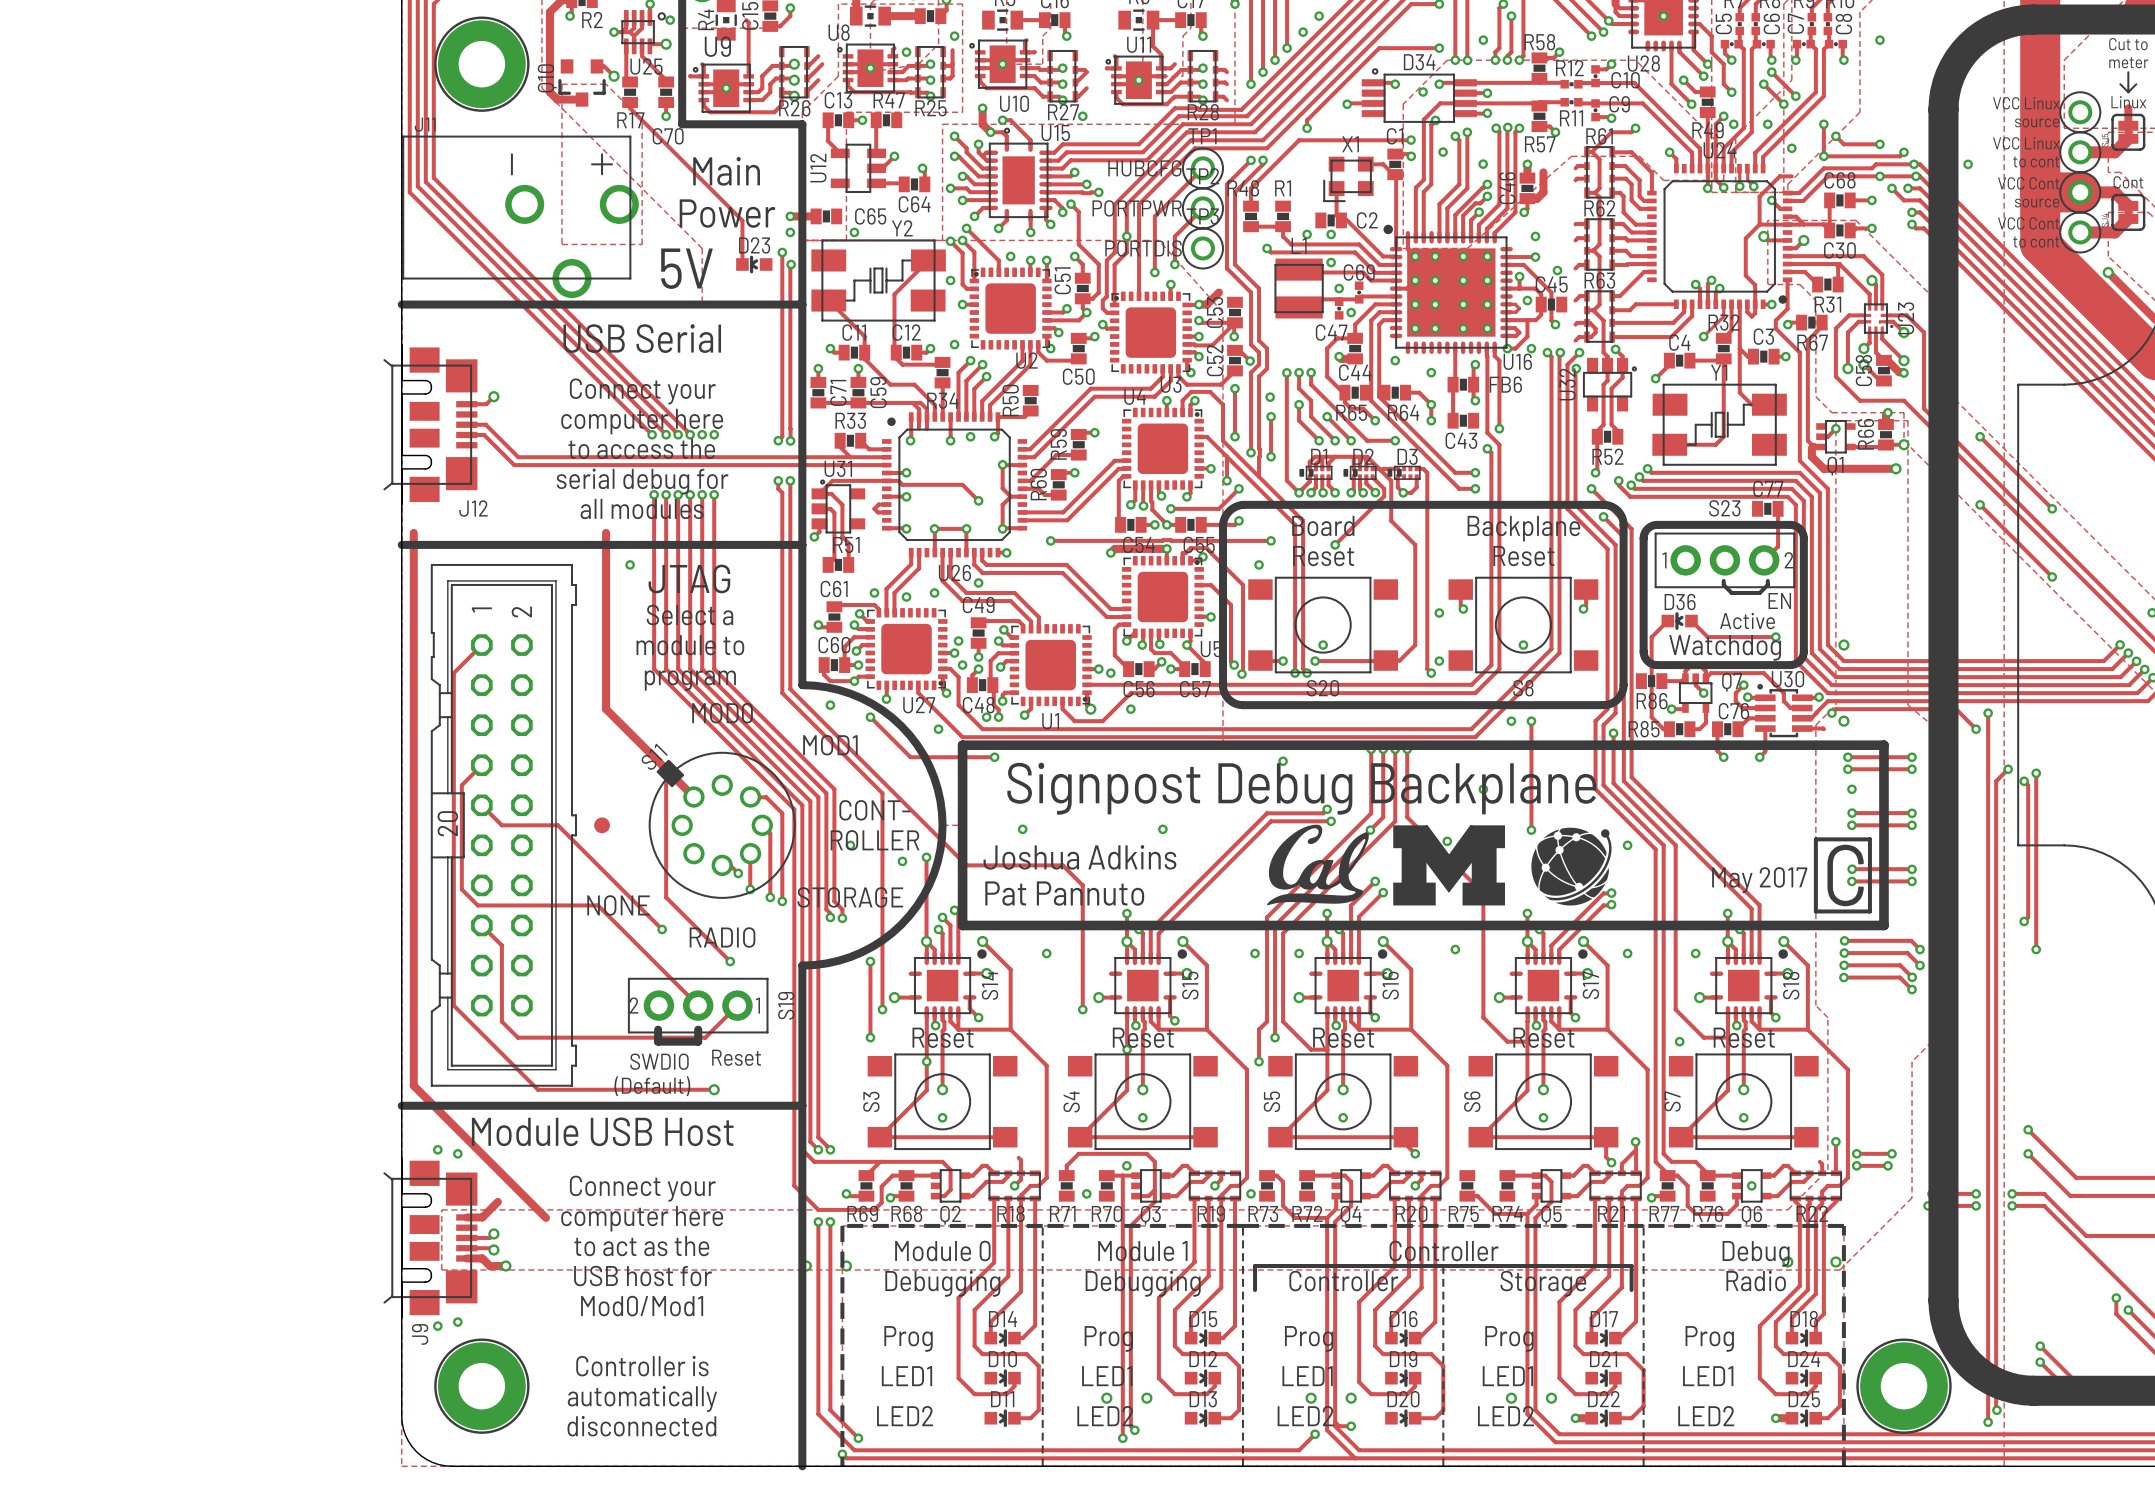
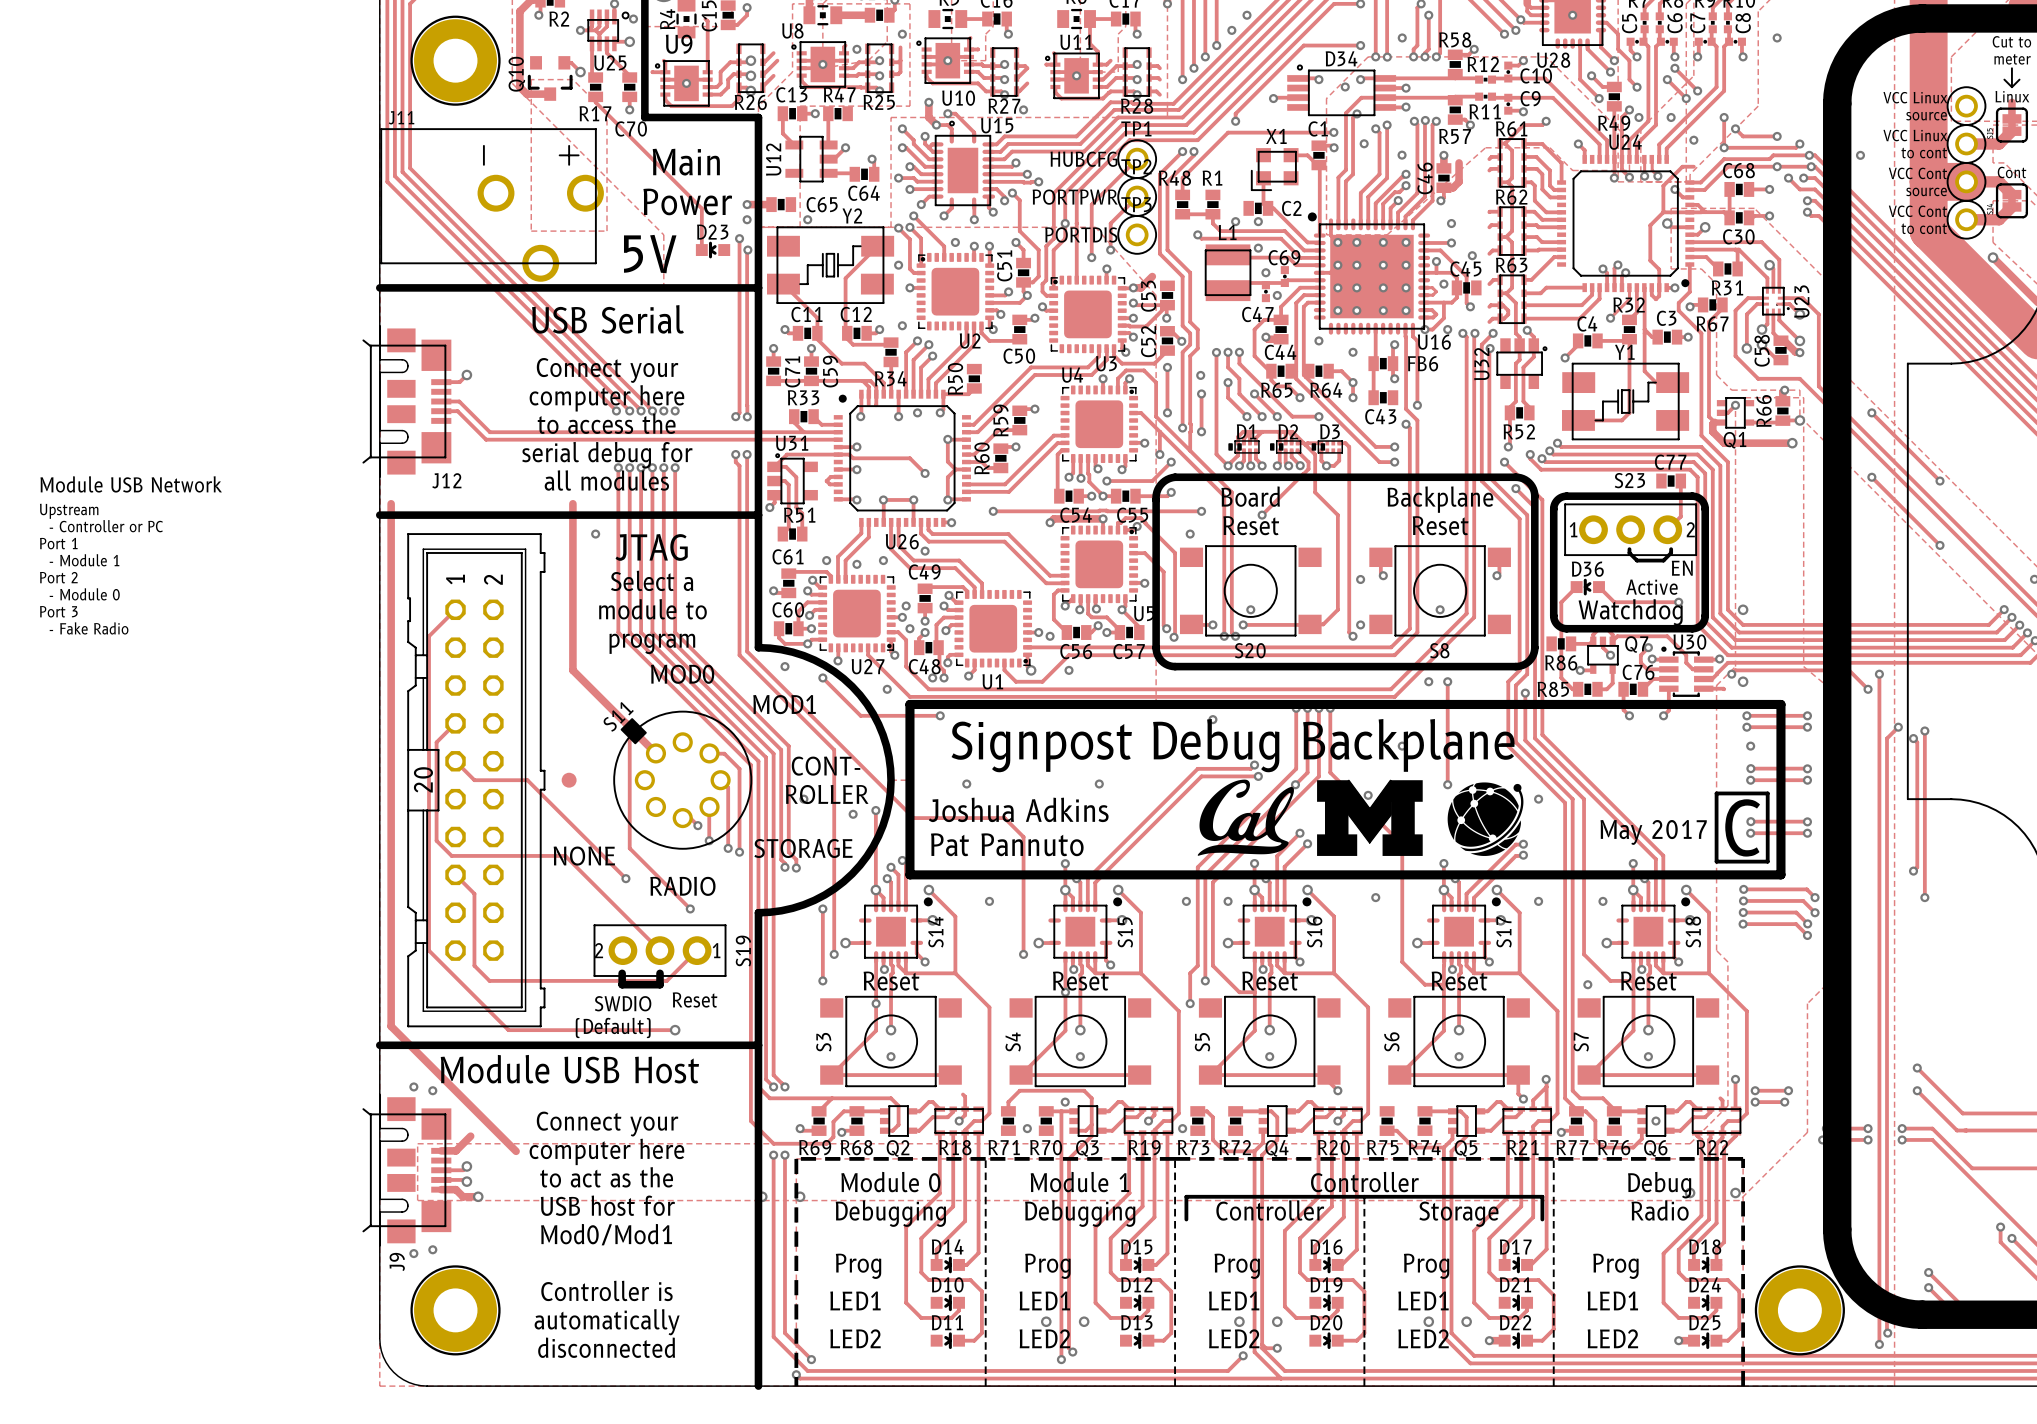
text: none -> Module USB Network (131, 484)
text: none -> Upstream (69, 511)
text: none -> - Controller or PC (106, 526)
text: none -> Port 1 (58, 543)
text: none -> - Module 1 (84, 560)
text: none -> Port 2 (58, 577)
text: none -> - Module 0 (84, 594)
text: none -> Port 3 (58, 611)
text: none -> - Fake Radio (89, 628)

